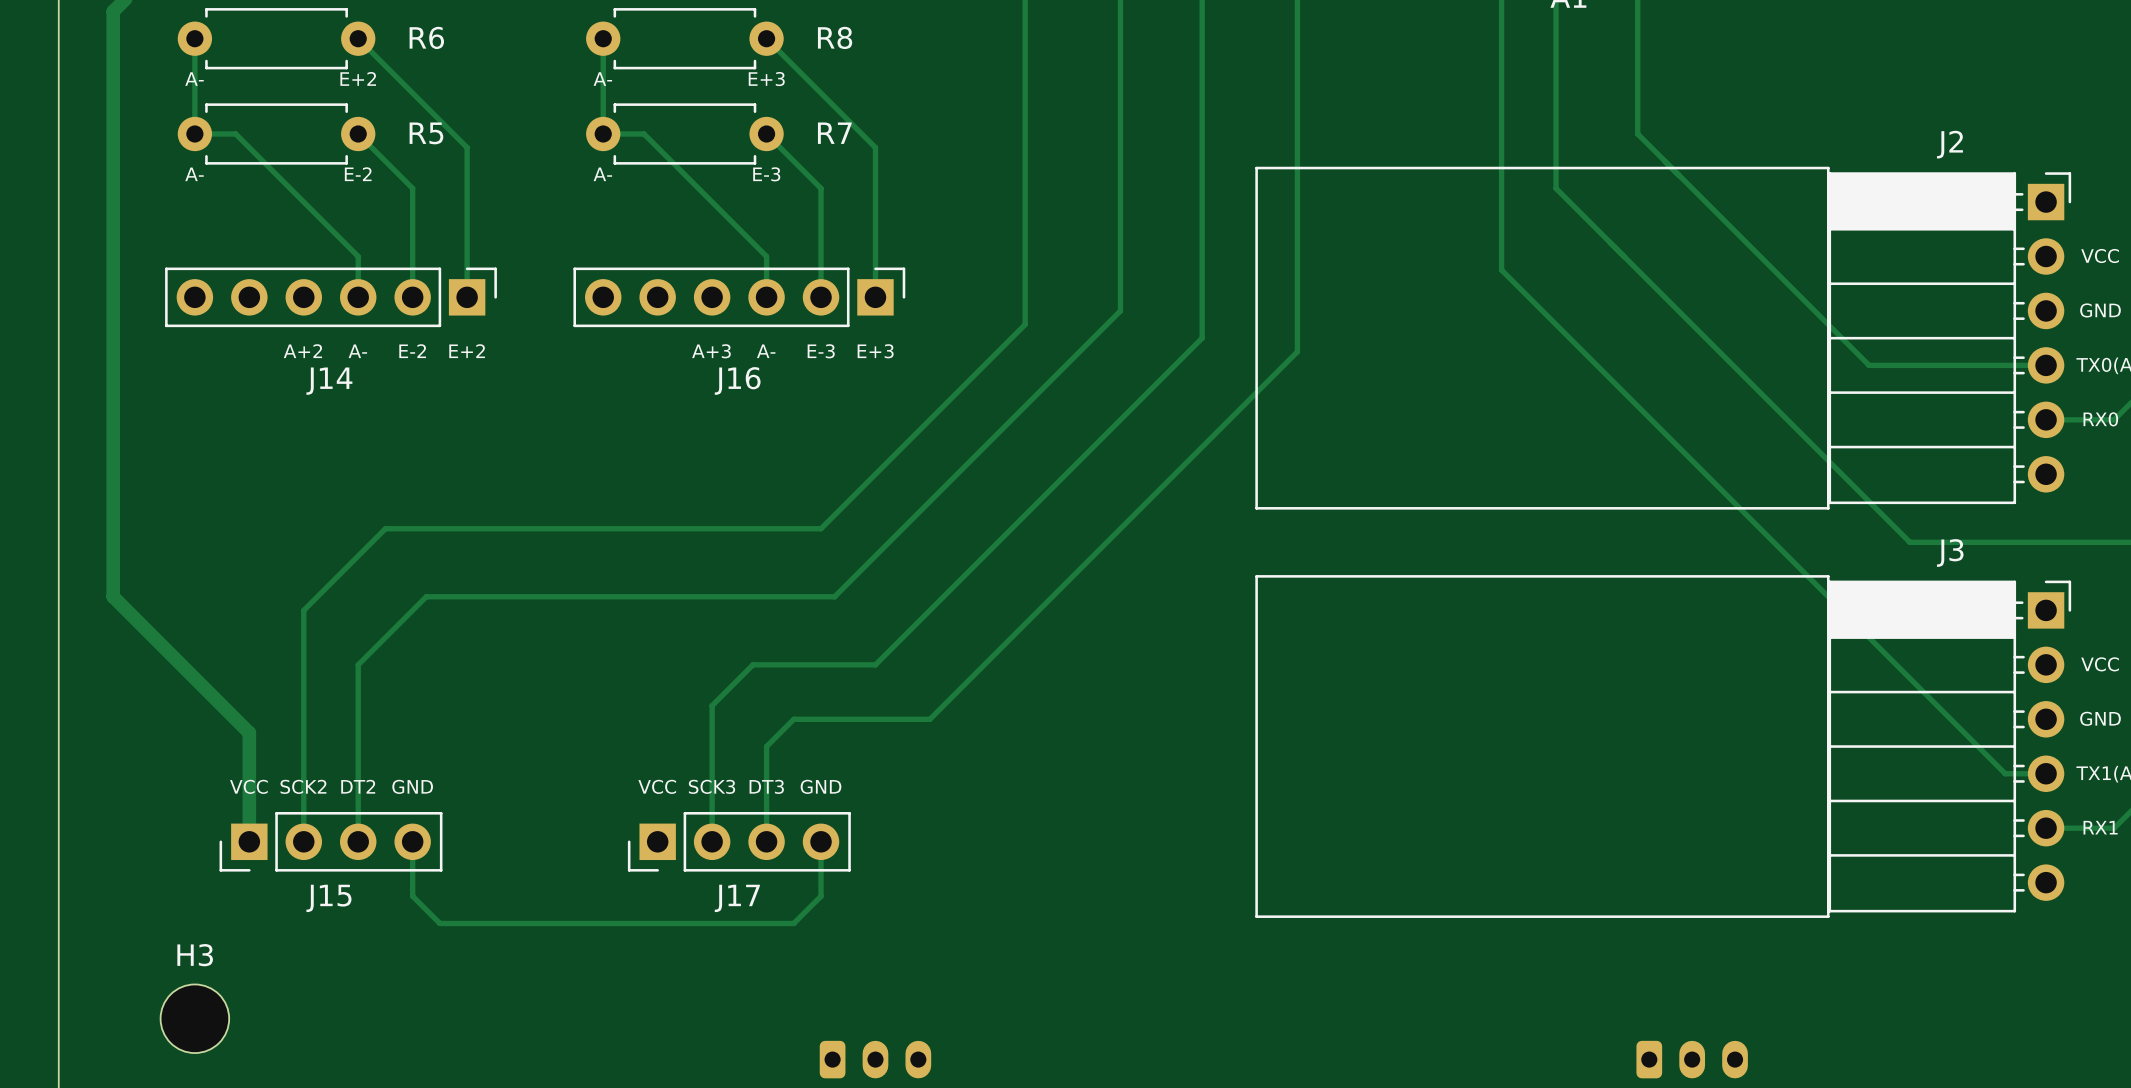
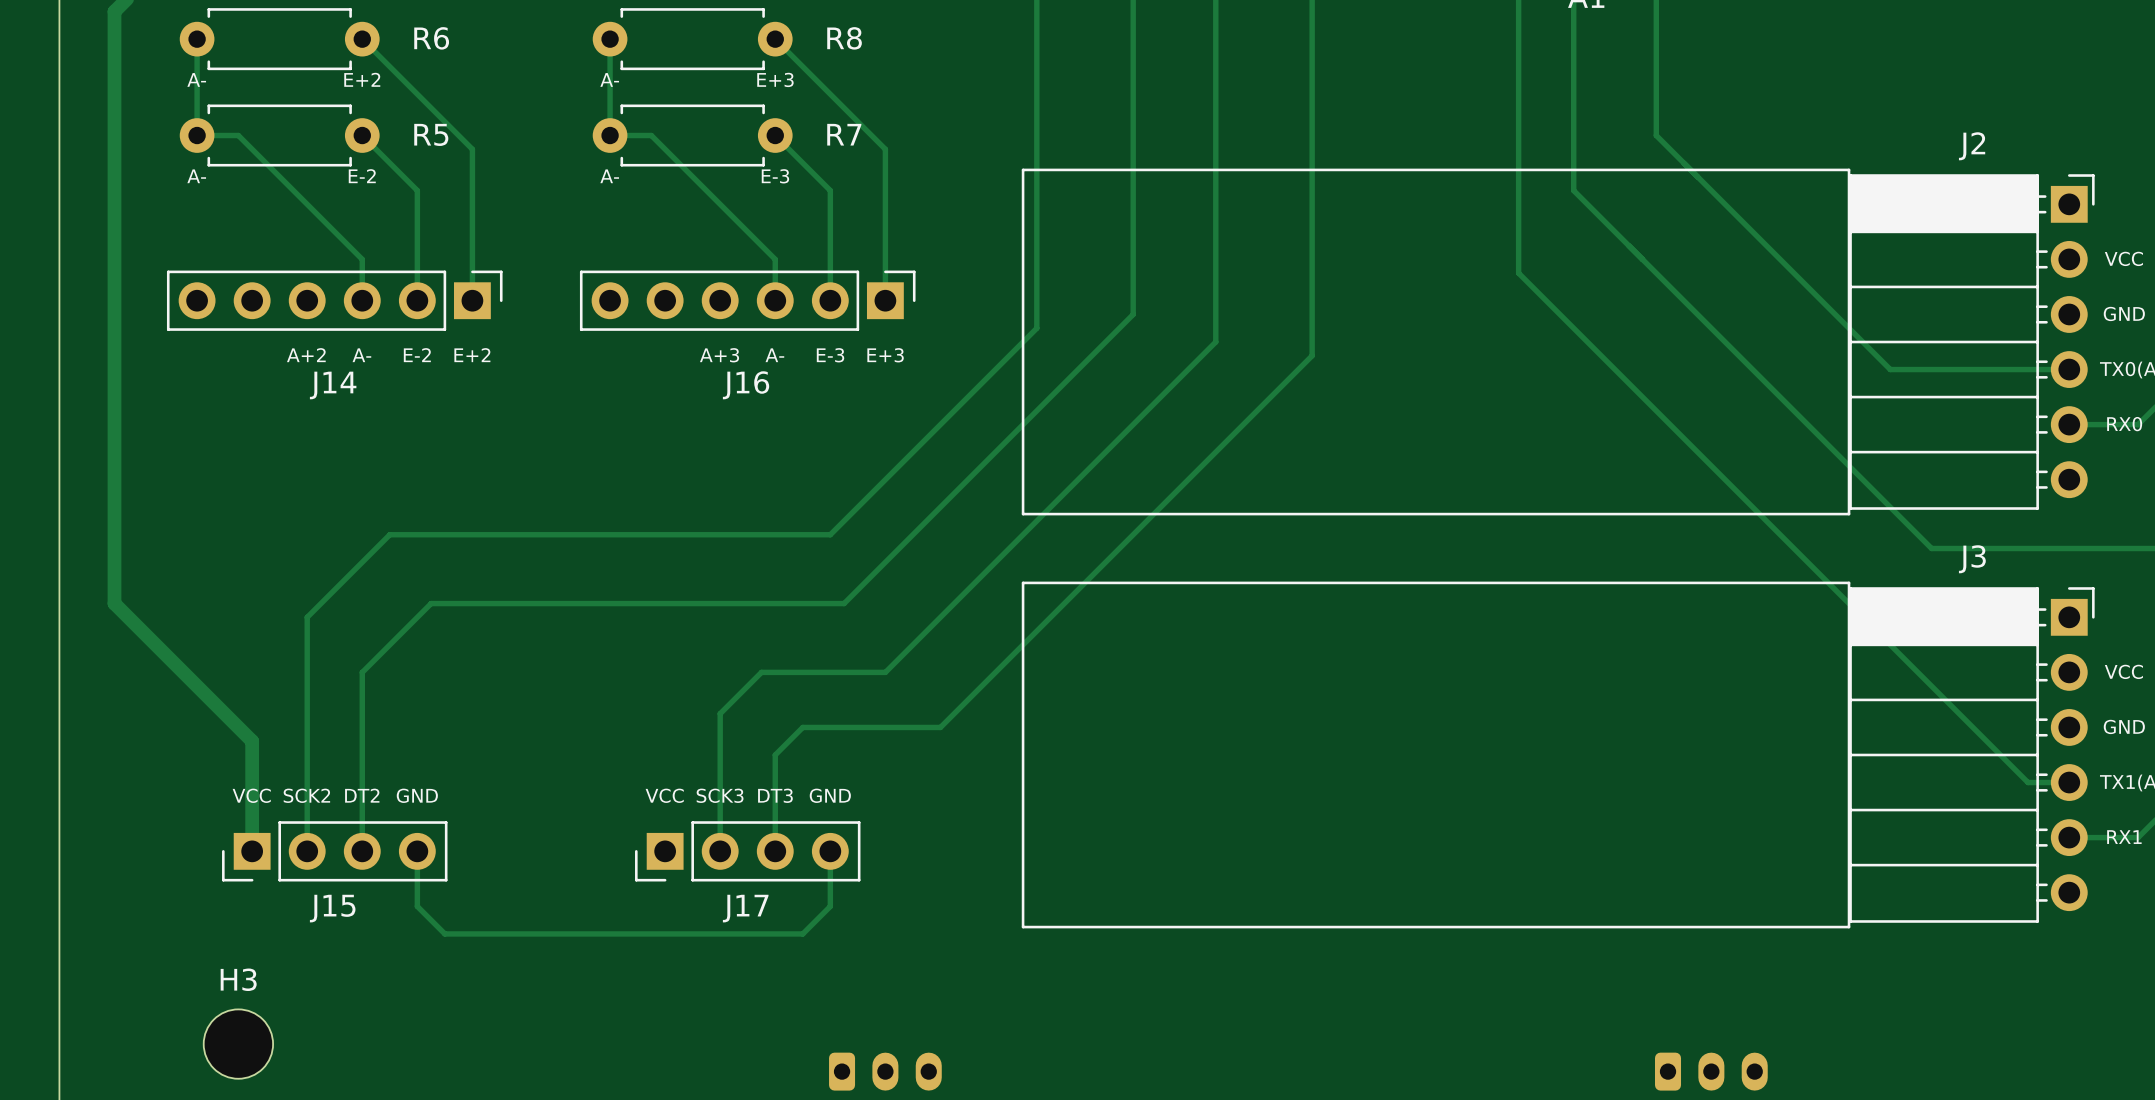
line: (1256, 168) (1256, 508) -> (1270, 169) (1023, 169) (1023, 514) (1270, 514)
line: (1256, 576) (1256, 916) -> (1270, 582) (1023, 582) (1023, 927) (1270, 927)
H3 position: (194, 1018) -> (238, 1044)

